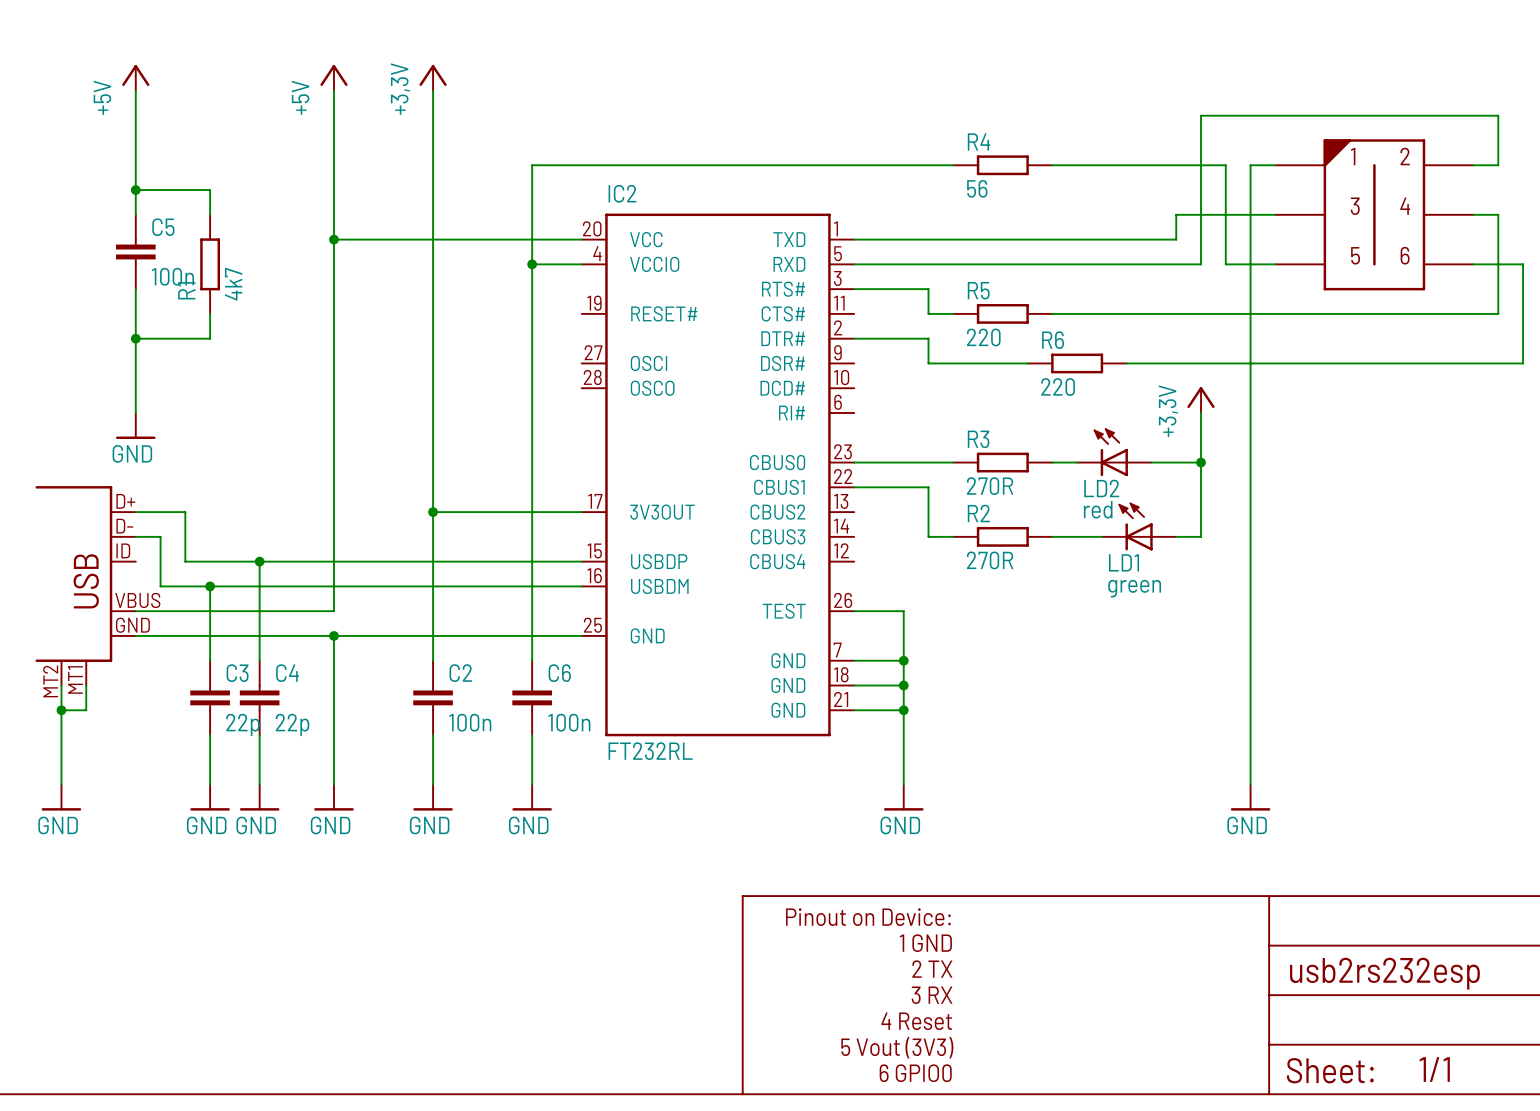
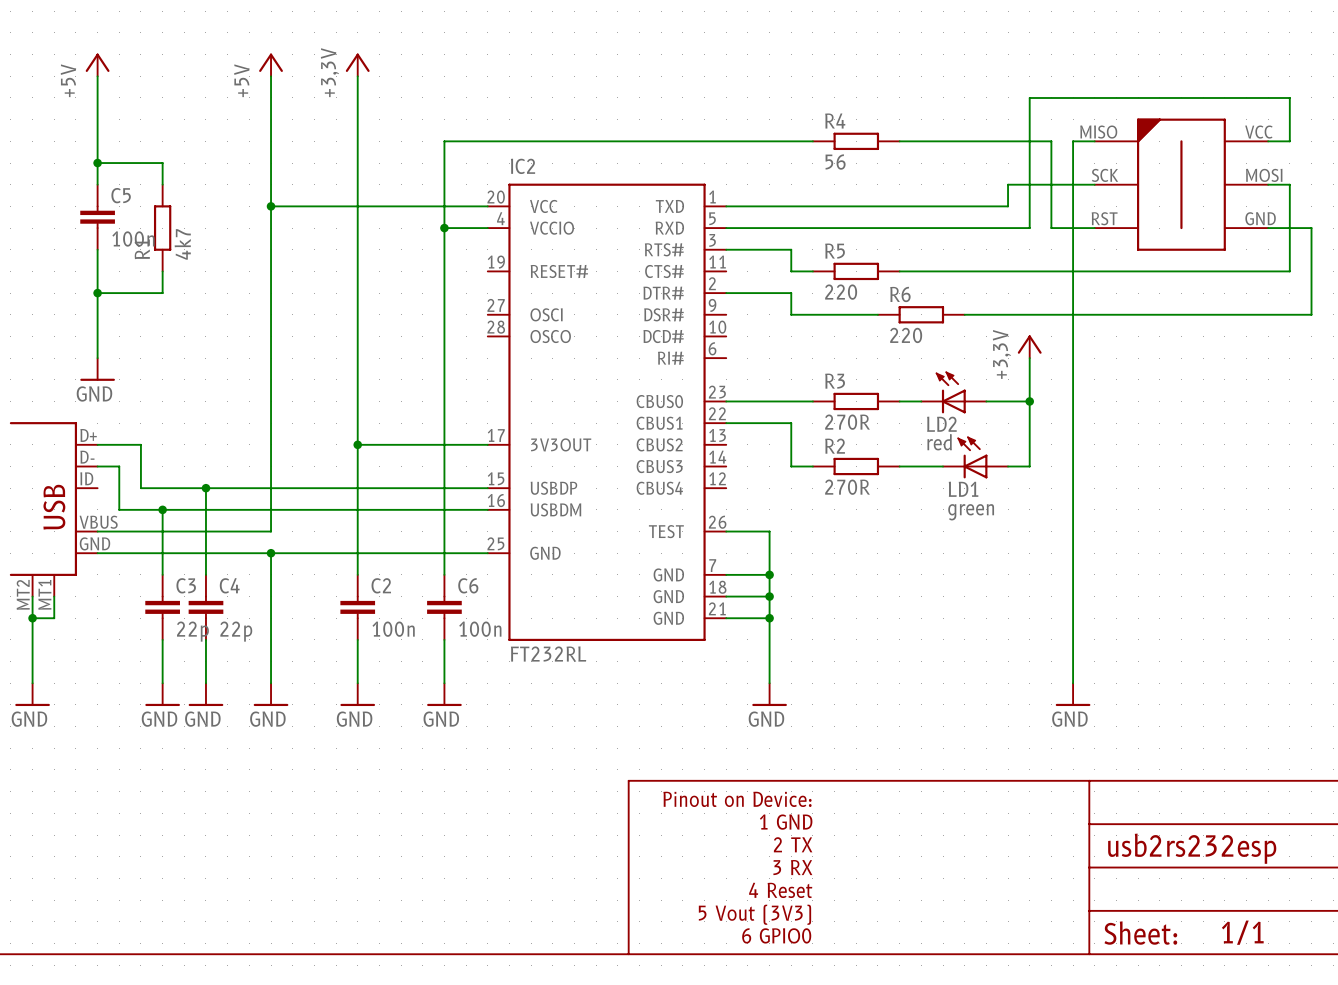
part pin number: none -> MISO (1098, 132)
part pin number: none -> VCC (1258, 132)
text: 1 (1353, 156) -> none
text: 2 (1405, 156) -> none
part pin number: none -> SCK (1105, 175)
part pin number: none -> MOSI (1264, 175)
text: 3 (1355, 206) -> none
text: 4 (1405, 206) -> none
part pin number: none -> RST (1104, 218)
part pin number: none -> GND (1260, 218)
text: 5 (1355, 255) -> none
text: 6 (1405, 255) -> none

